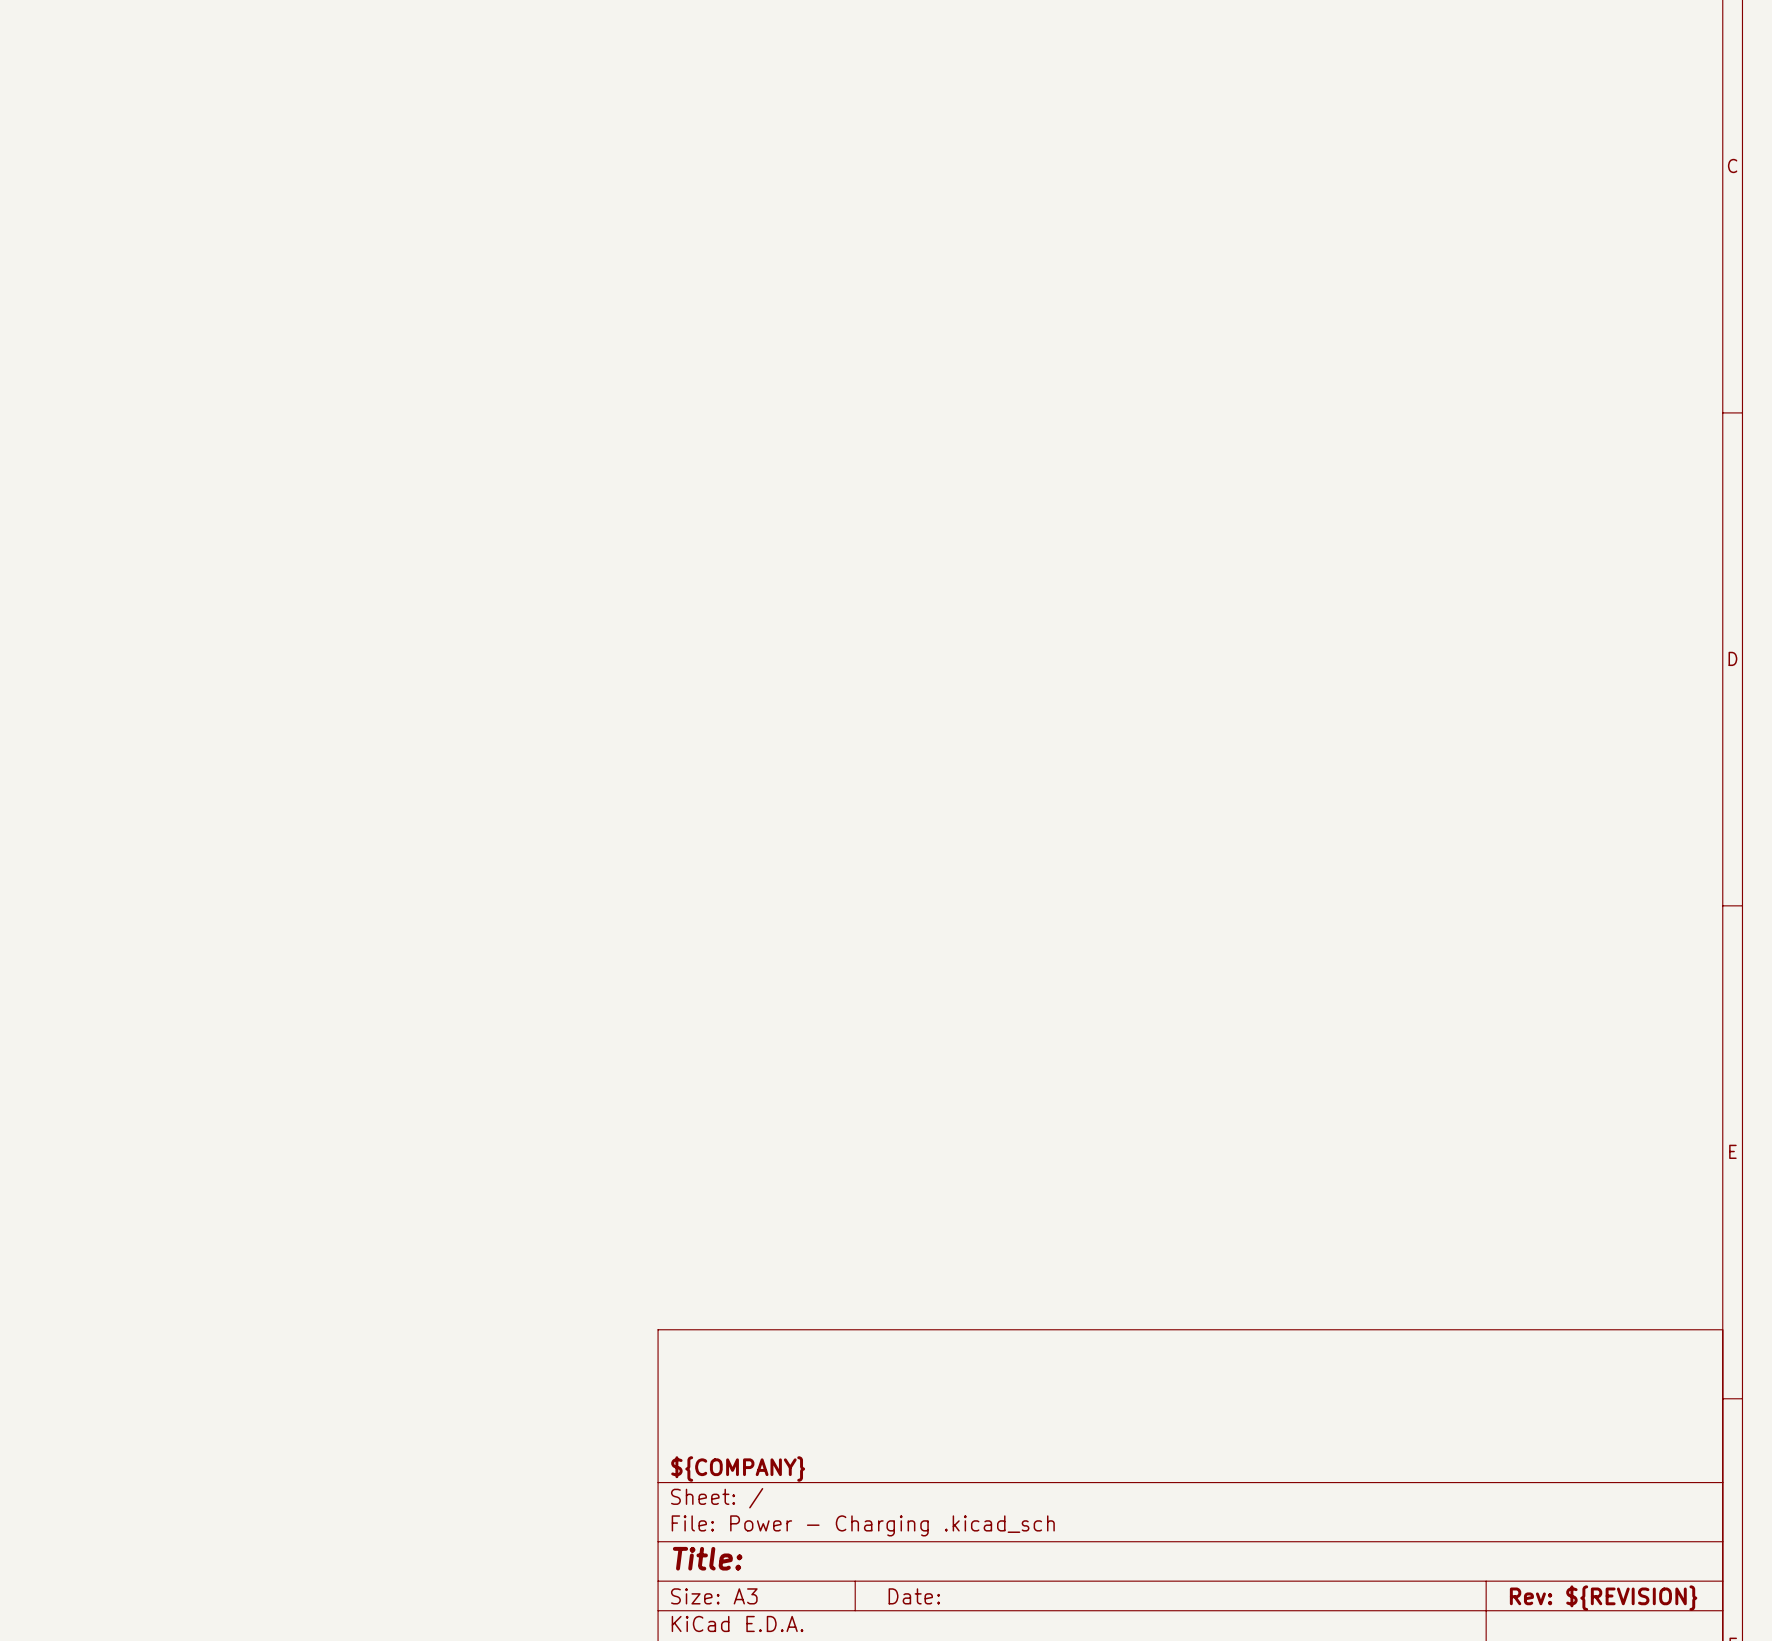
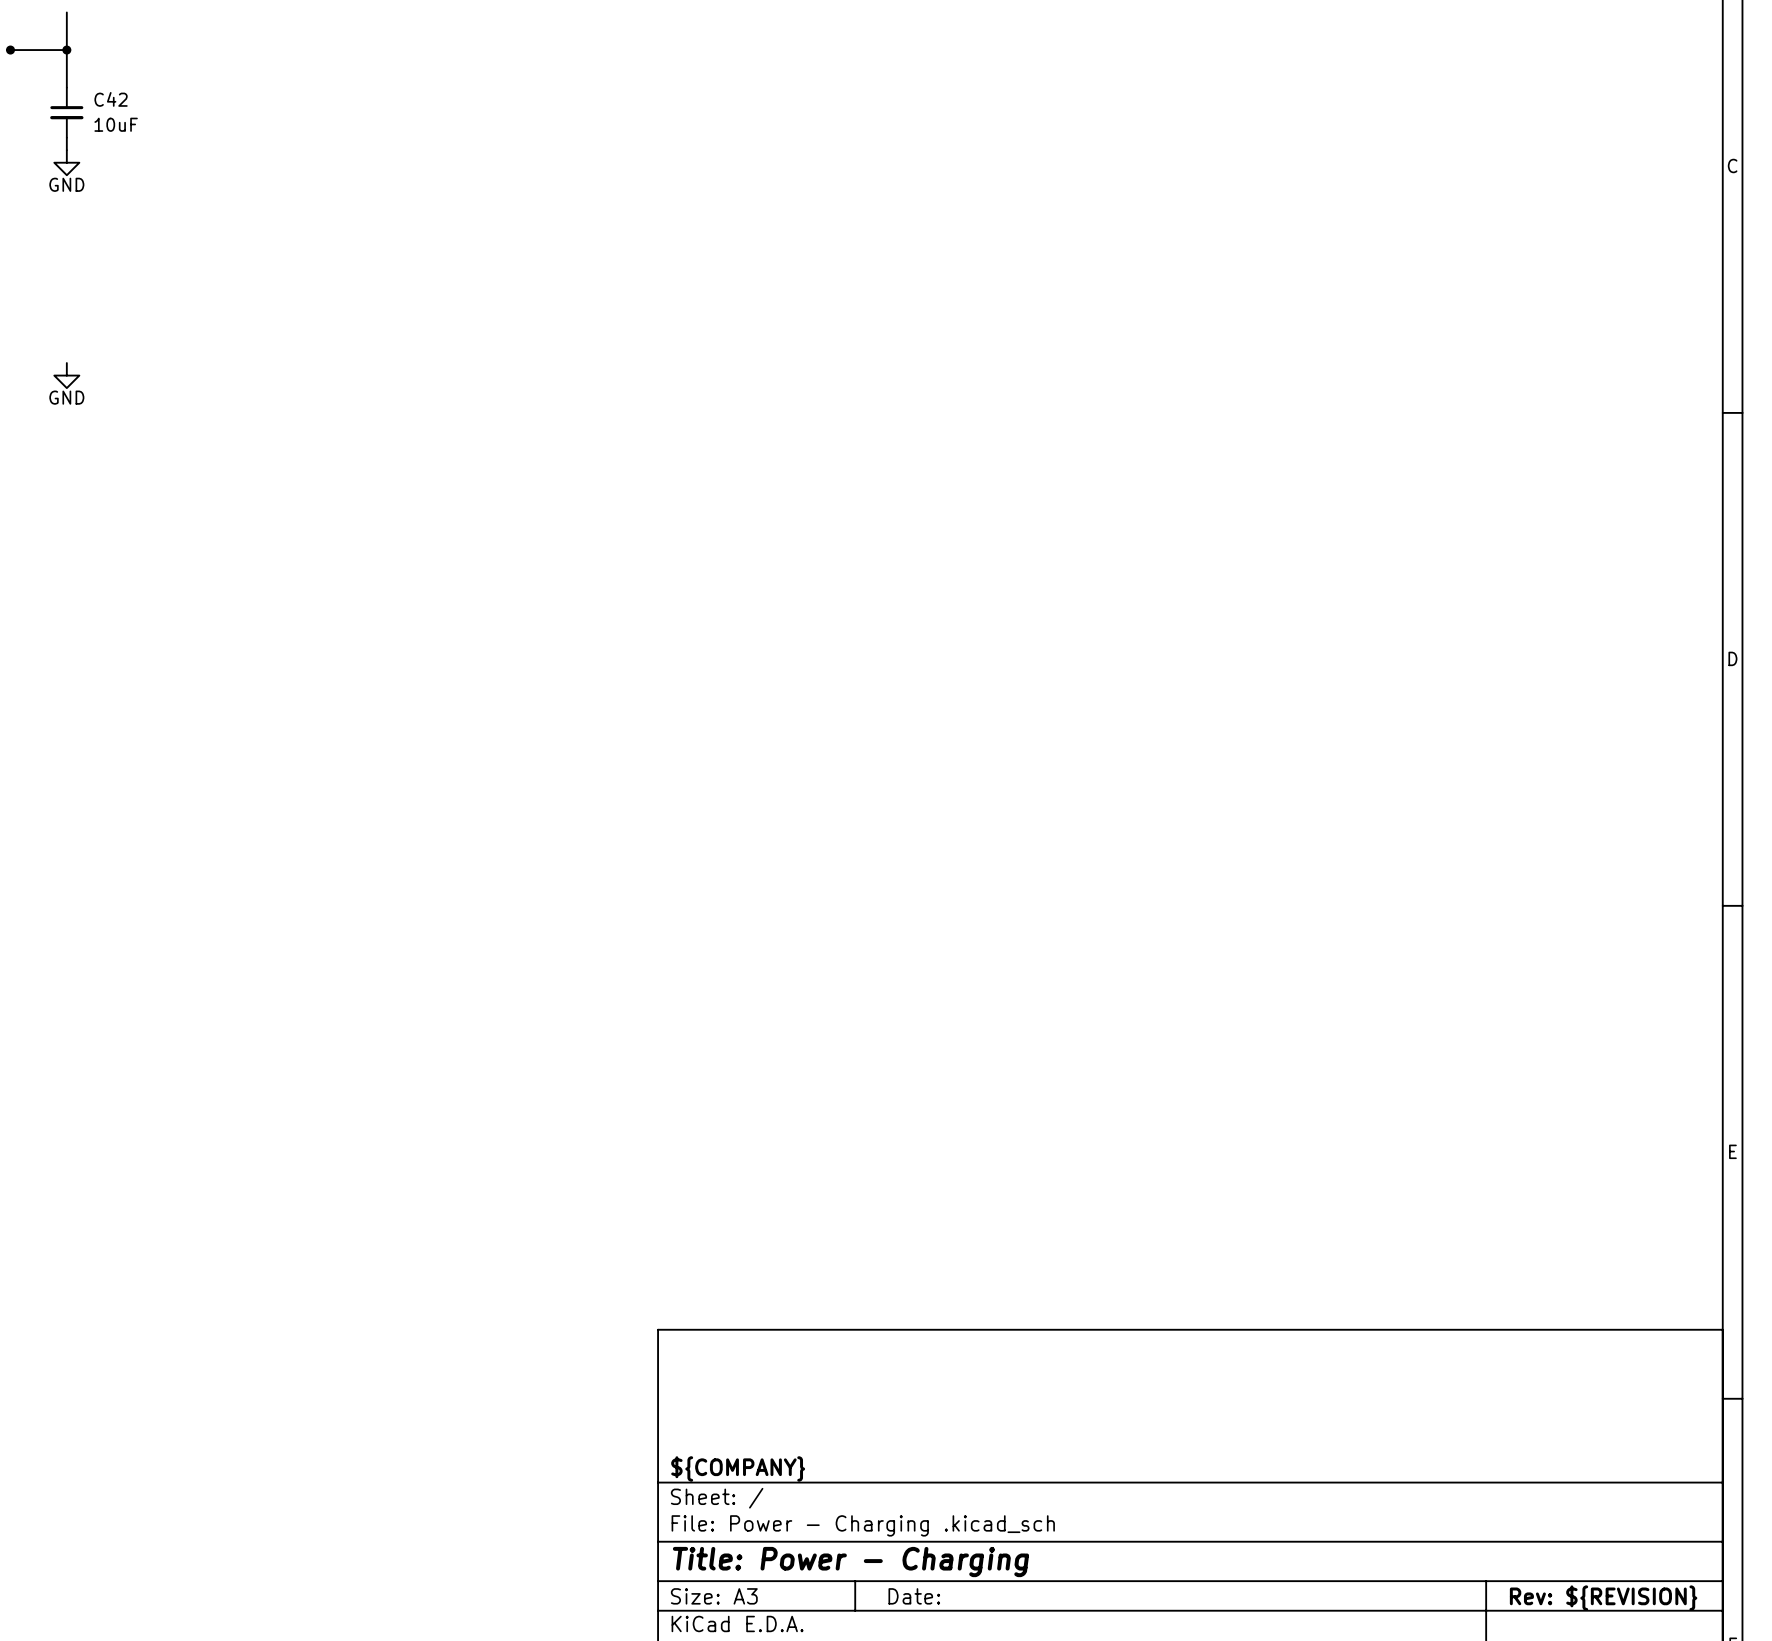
wire: none -> (66, 12) (66, 87)
wire: none -> (10, 50) (66, 50)
junction: none -> (10, 50)
junction: none -> (66, 50)
C42: none -> 10uF (66, 112)
wire: none -> (66, 137) (66, 150)
power symbol: none -> GND (66, 162)
power symbol: none -> GND (66, 375)
title block: Title: (707, 1558) -> Title: Power - Charging (850, 1562)

